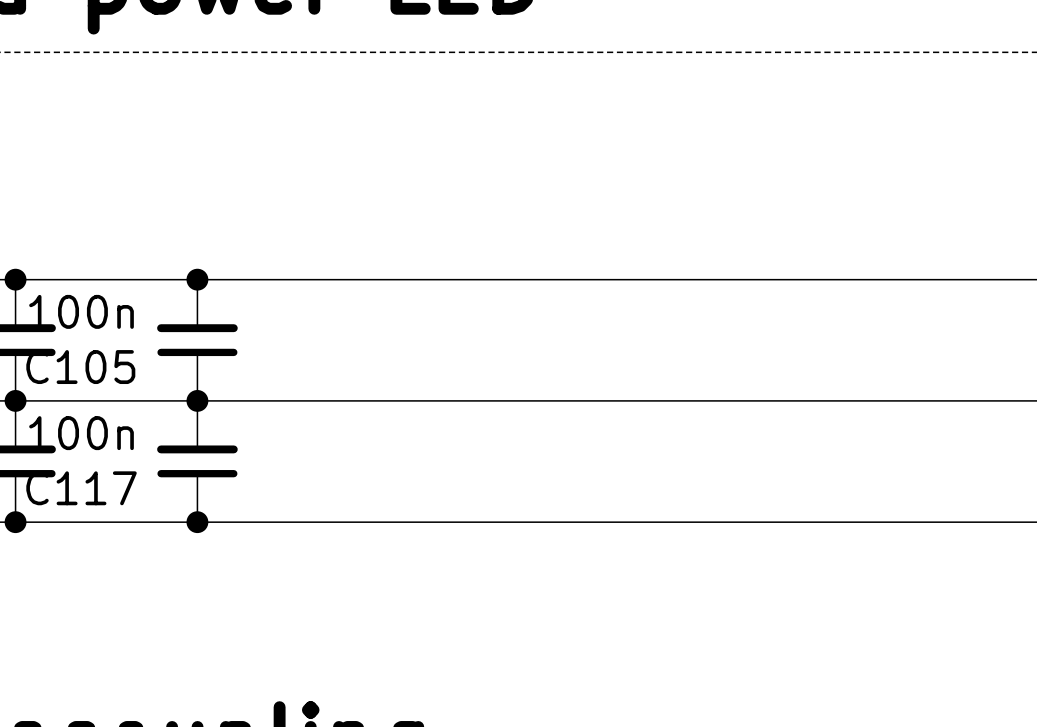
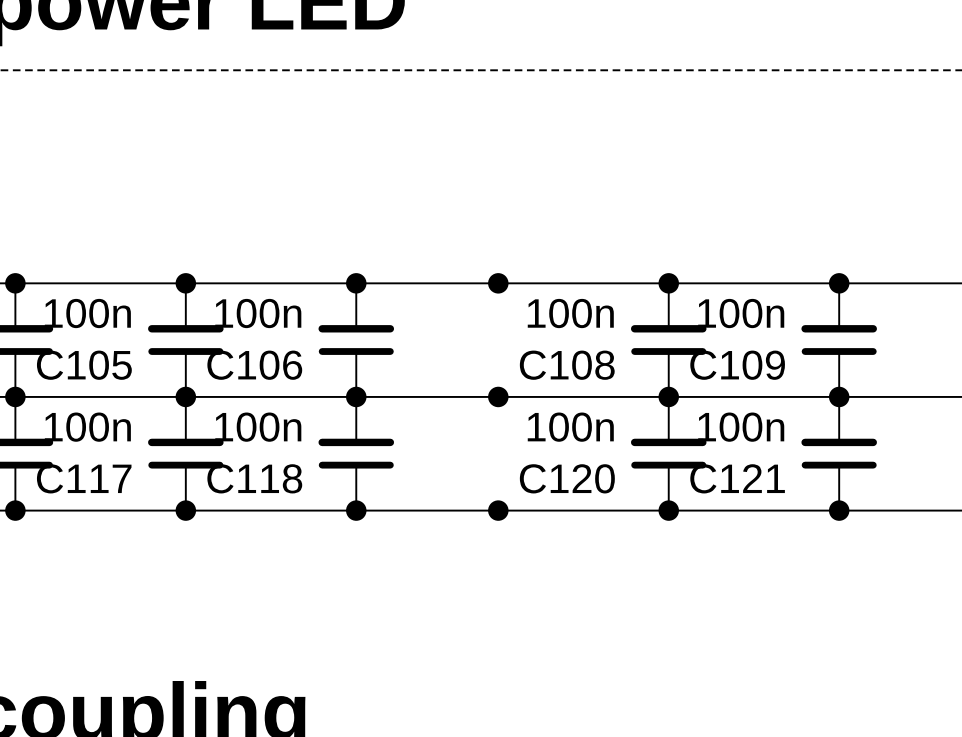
junction: none -> (356, 283)
junction: none -> (498, 283)
junction: none -> (668, 283)
junction: none -> (839, 283)
C106: none -> 100n (356, 340)
C108: none -> 100n (668, 340)
C109: none -> 100n (839, 340)
junction: none -> (356, 396)
junction: none -> (498, 396)
junction: none -> (668, 396)
junction: none -> (839, 396)
C118: none -> 100n (356, 453)
C120: none -> 100n (668, 453)
C121: none -> 100n (839, 453)
junction: none -> (356, 510)
junction: none -> (498, 510)
junction: none -> (668, 510)
junction: none -> (839, 510)

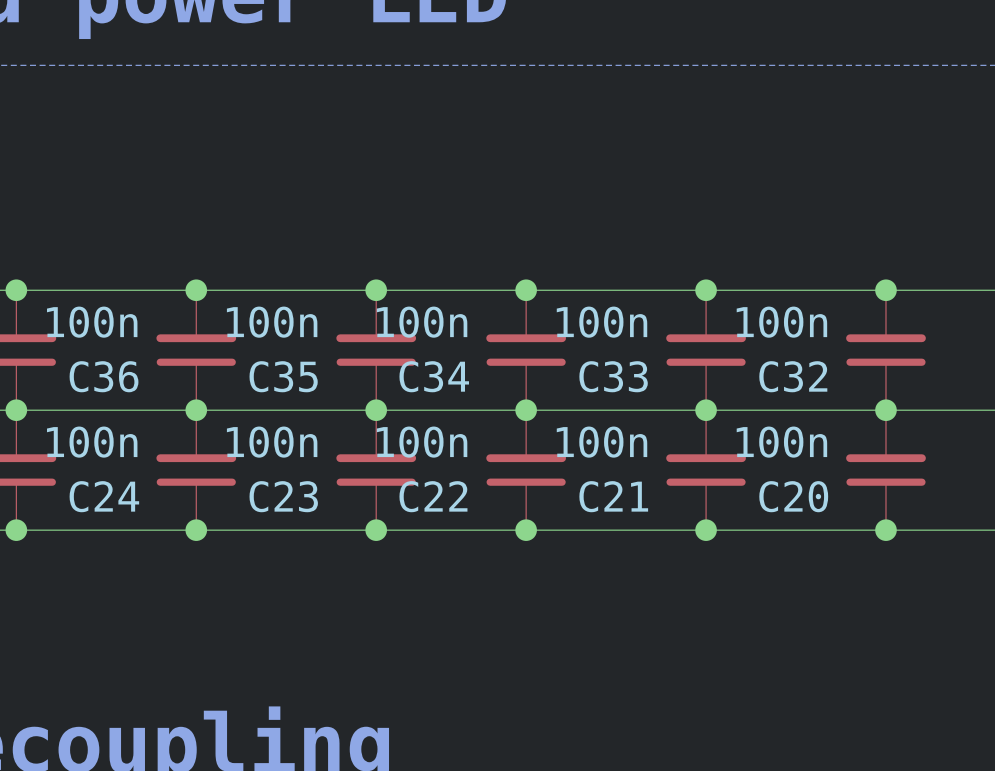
C34: none -> 100n (526, 350)
C105 name: C105 (84, 365) -> C36 (104, 376)
C106 name: C106 (254, 365) -> C35 (283, 376)
C108 name: C108 (567, 365) -> C33 (613, 376)
C109 name: C109 (737, 365) -> C32 (793, 376)
C22: none -> 100n (526, 470)
C117 name: C117 (84, 478) -> C24 (104, 496)
C118 name: C118 (254, 478) -> C23 (283, 496)
C120 name: C120 (567, 478) -> C21 (613, 496)
C121 name: C121 (737, 478) -> C20 (793, 496)

